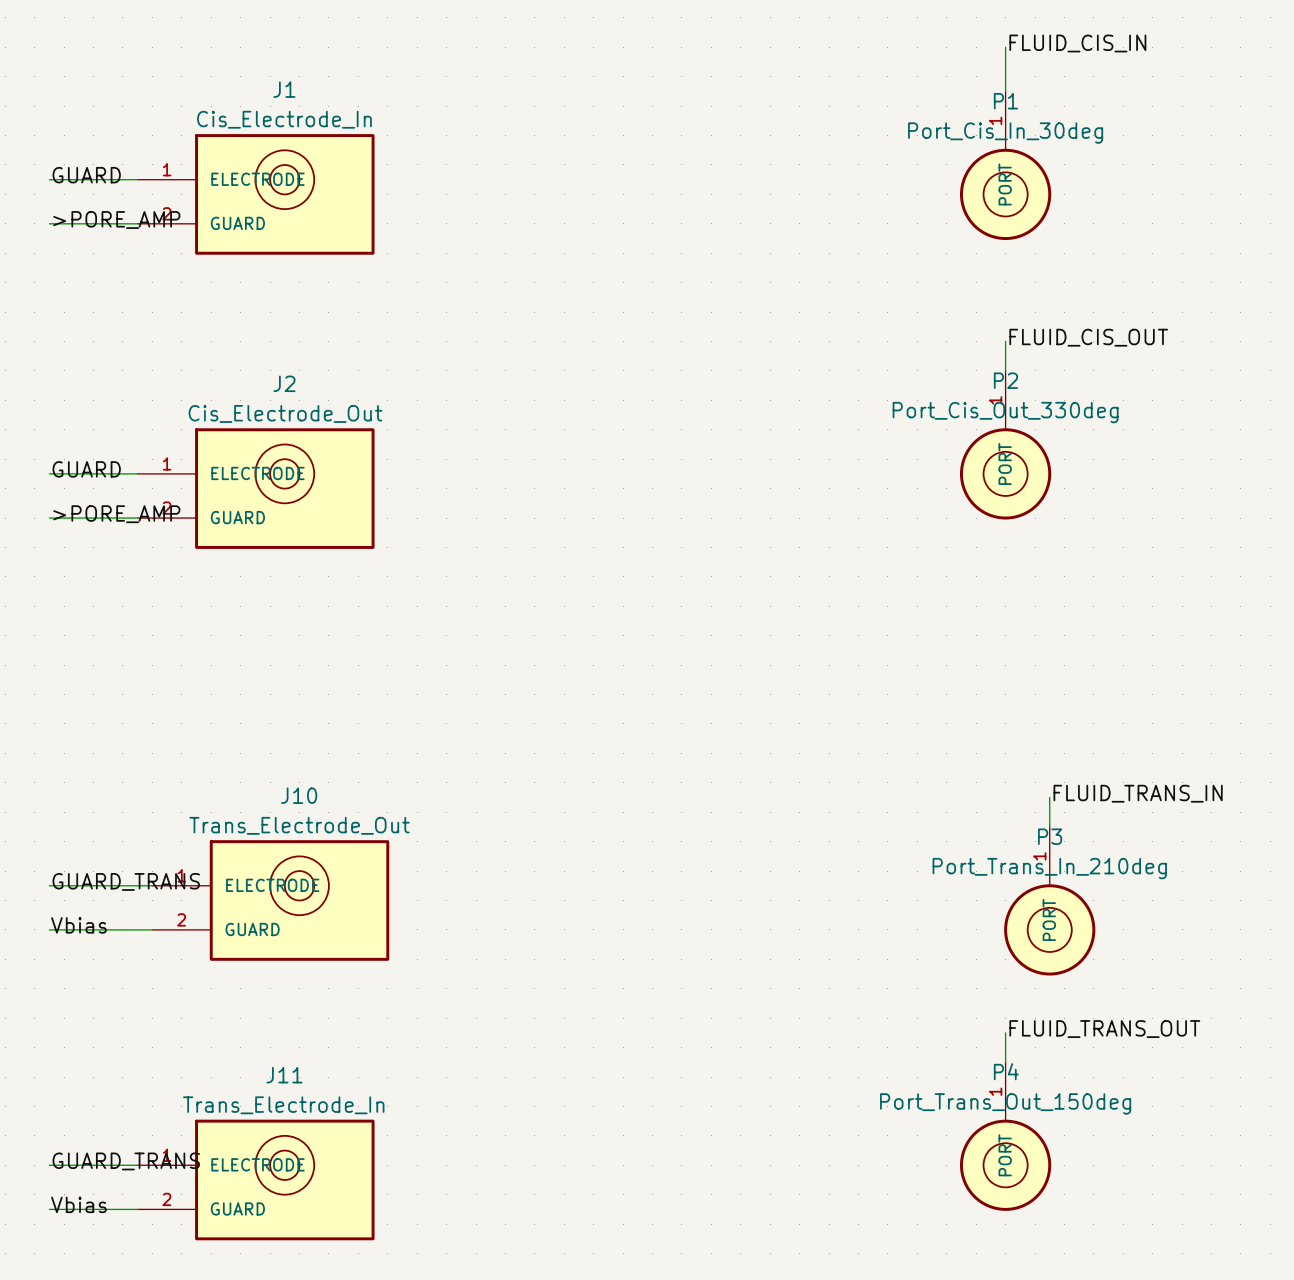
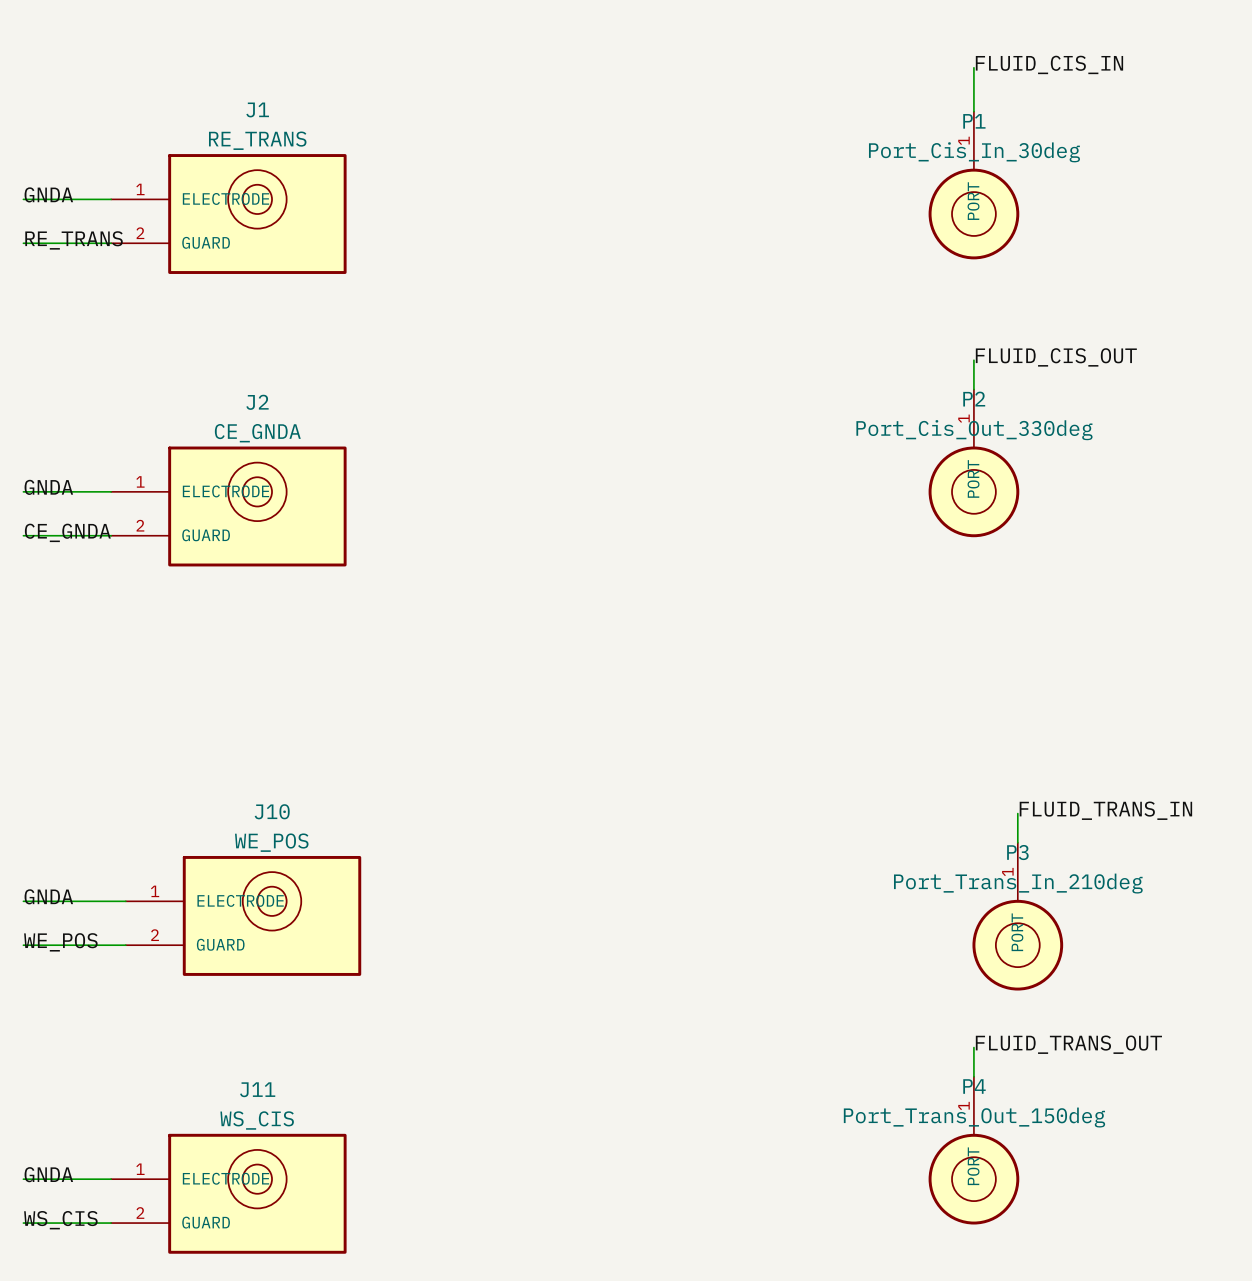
J1 value: Cis_Electrode_In (284, 119) -> RE_TRANS (257, 140)
label: GUARD (86, 175) -> GNDA (48, 194)
label: >PORE_AMP (116, 220) -> RE_TRANS (74, 240)
J2 value: Cis_Electrode_Out (285, 413) -> CE_GNDA (257, 433)
label: GUARD (86, 469) -> GNDA (48, 487)
label: >PORE_AMP (116, 514) -> CE_GNDA (67, 532)
J10 value: Trans_Electrode_Out (299, 825) -> WE_POS (271, 842)
label: GUARD_TRANS (126, 881) -> GNDA (48, 896)
label: Vbias (78, 925) -> WE_POS (60, 942)
J11 value: Trans_Electrode_In (283, 1105) -> WS_CIS (257, 1120)
label: GUARD_TRANS (126, 1161) -> GNDA (48, 1174)
label: Vbias (78, 1204) -> WS_CIS (60, 1220)

